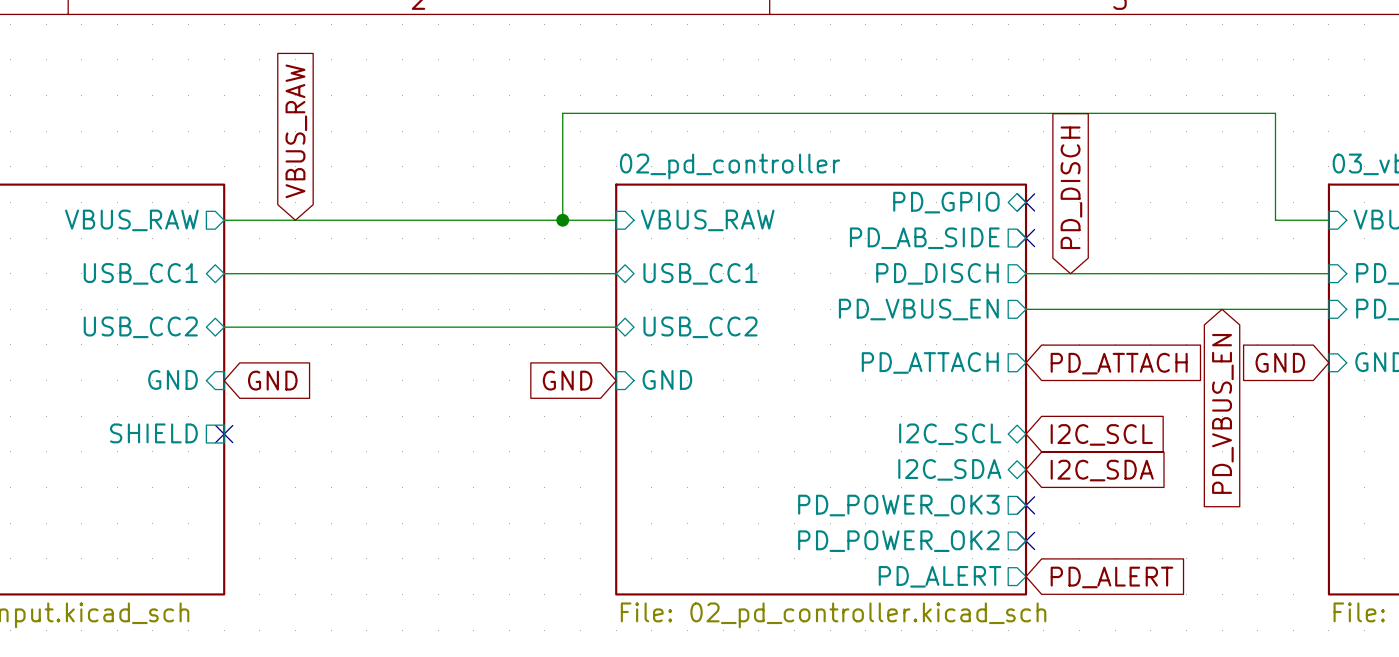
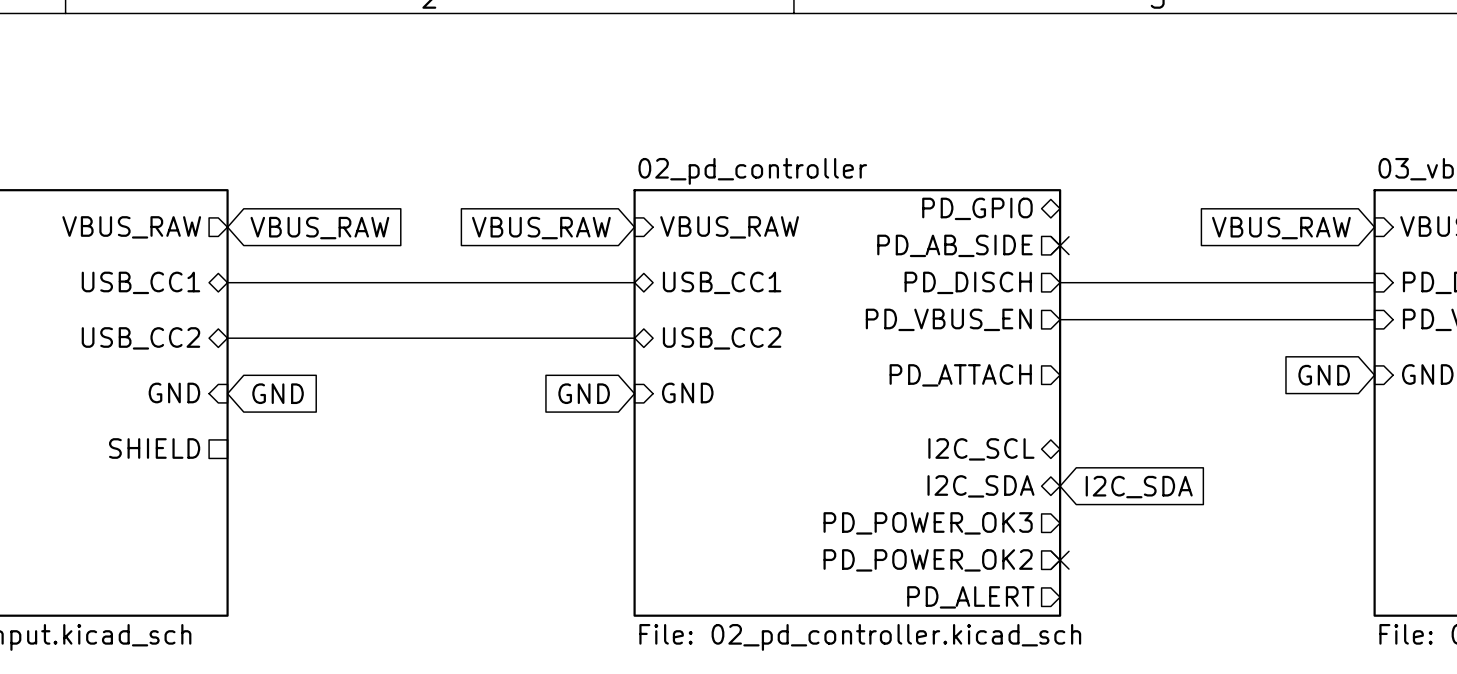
global label rotation: 0° (296, 131) -> 90° clockwise (319, 228)
global label: PD_DISCH (1071, 187) -> none
no-connect mark: (1026, 202) -> none
wire: (224, 220) (616, 220) -> none
wire: (562, 220) (562, 113) (1275, 113) (1275, 220) (1328, 220) -> none
junction: (562, 220) -> none
global label: none -> VBUS_RAW (541, 228)
global label: none -> VBUS_RAW (1281, 228)
global label: PD_ATTACH (1119, 363) -> none
global label: PD_VBUS_EN (1222, 413) -> none
no-connect mark: (224, 434) -> none
global label: I2C_SCL (1101, 434) -> none
no-connect mark: (1026, 505) -> none
global label: PD_ALERT (1111, 577) -> none

